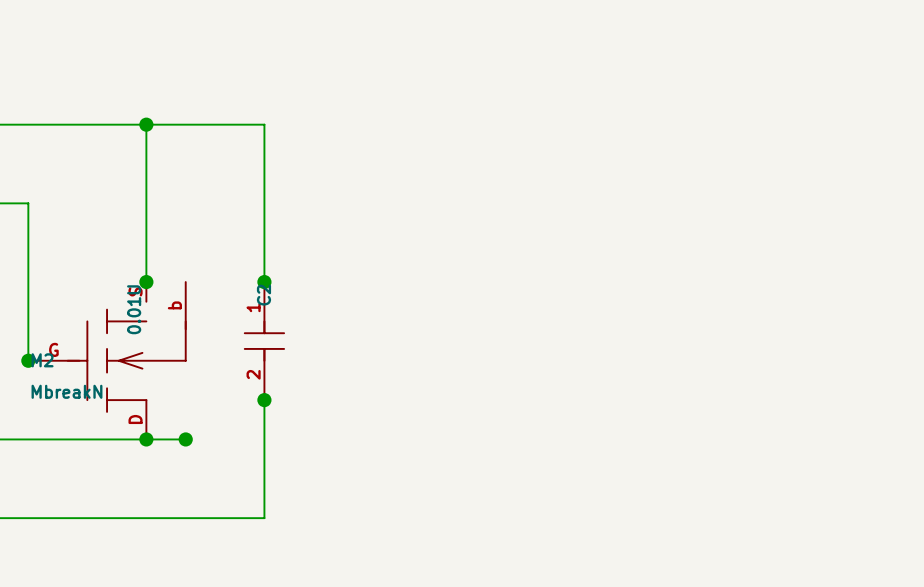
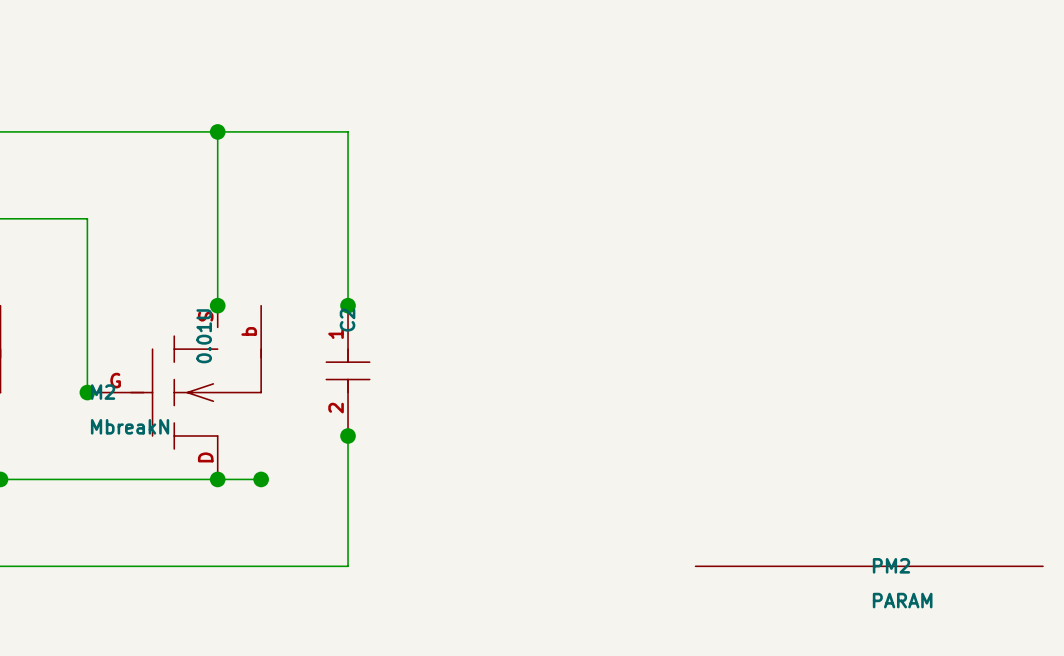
PM2: none -> PARAM (869, 566)

